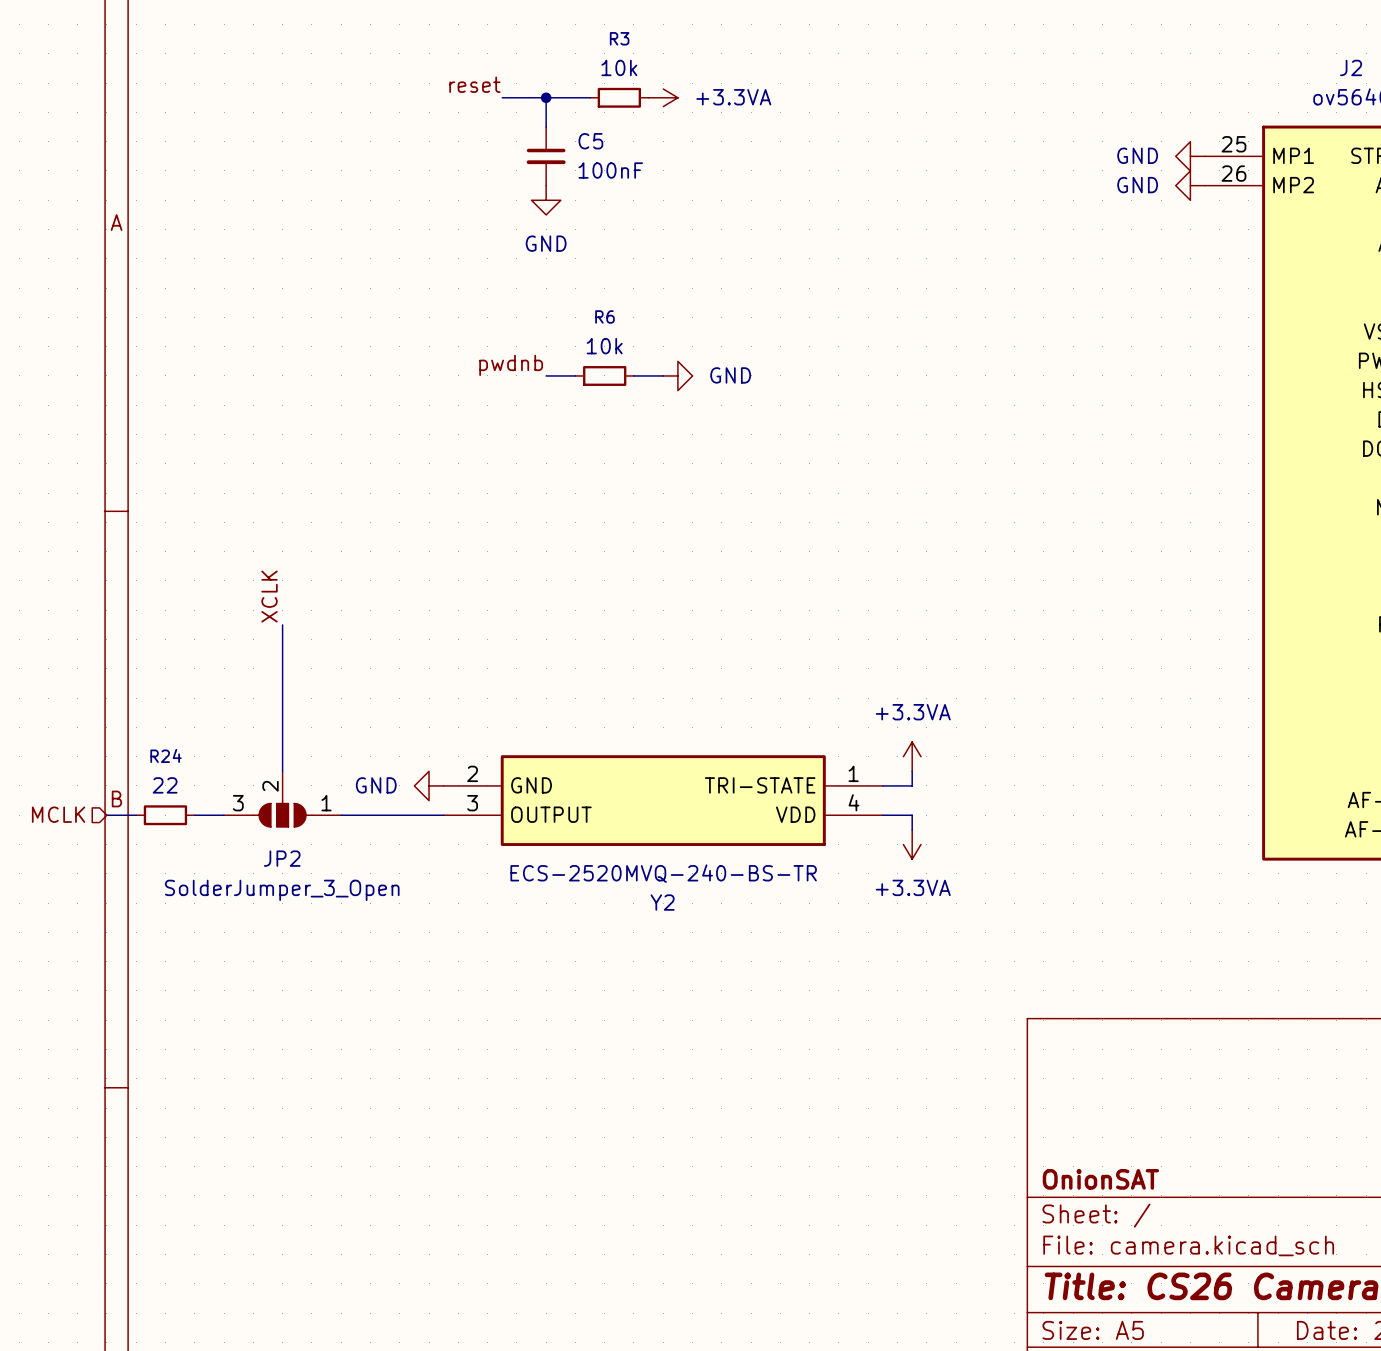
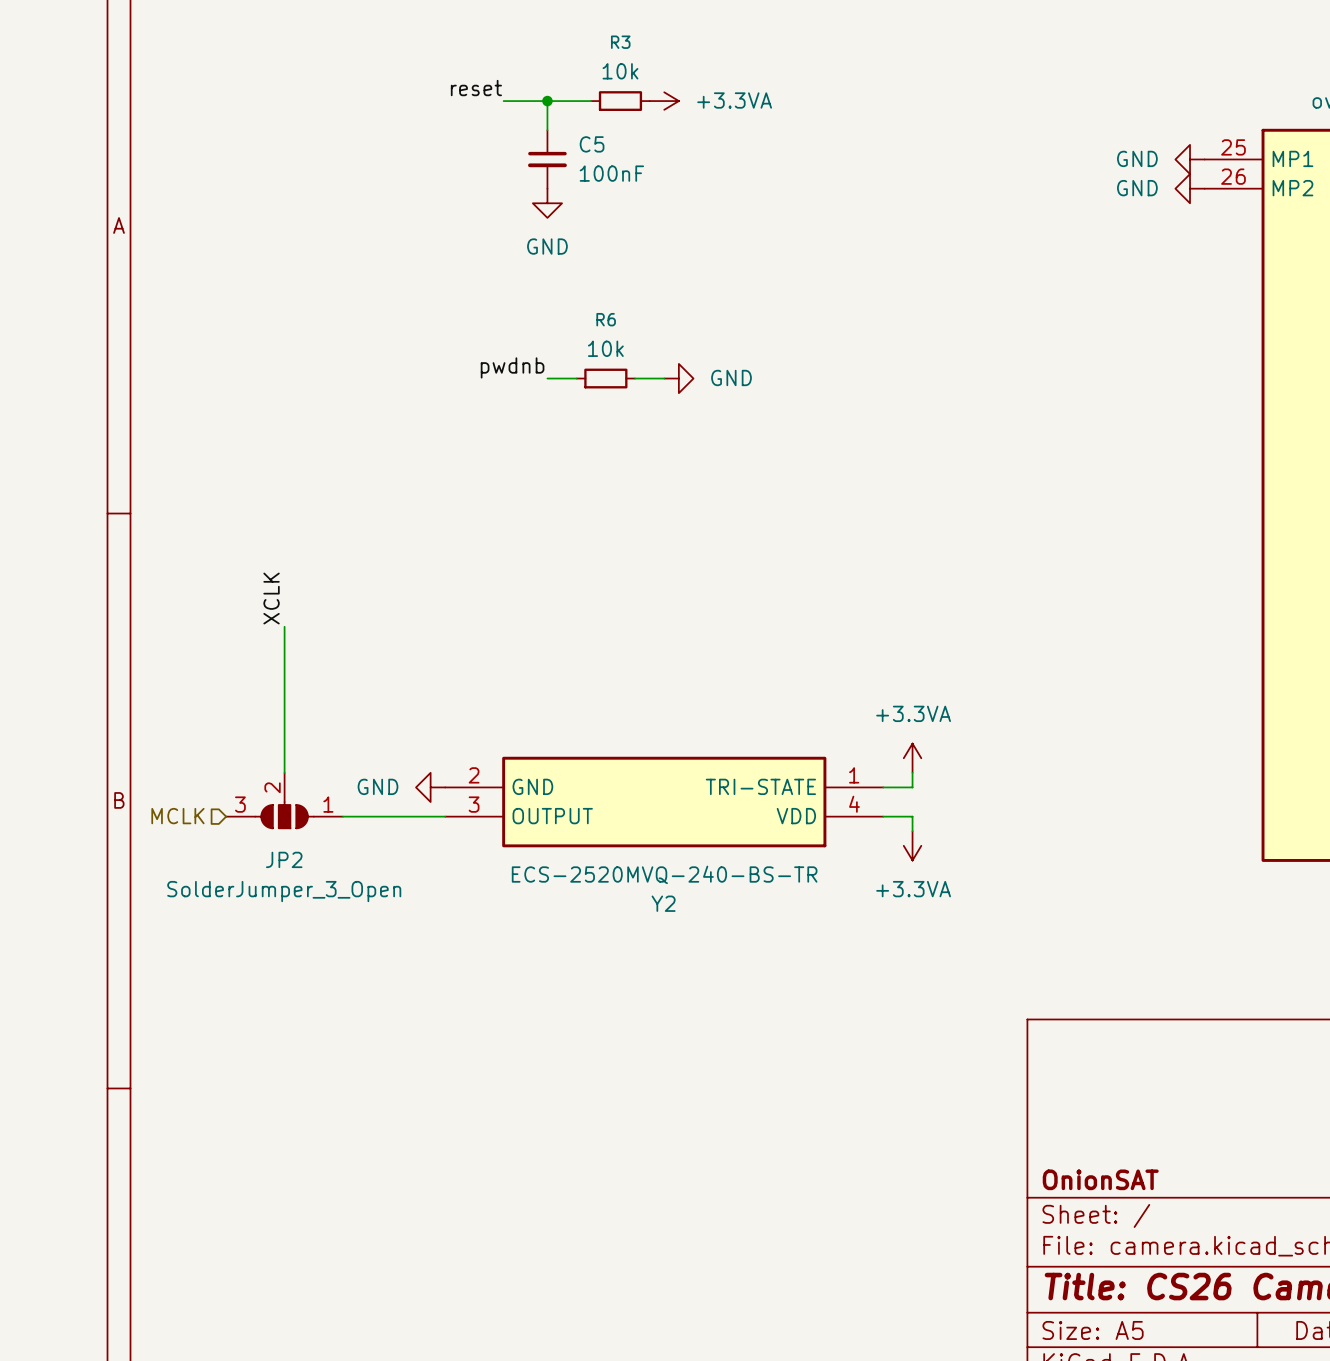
hierarchical label position: MCLK (58, 814) -> MCLK (177, 816)
wire: (106, 815) (136, 815) -> none
R24: 22 (165, 815) -> none
wire: (194, 815) (224, 815) -> none

